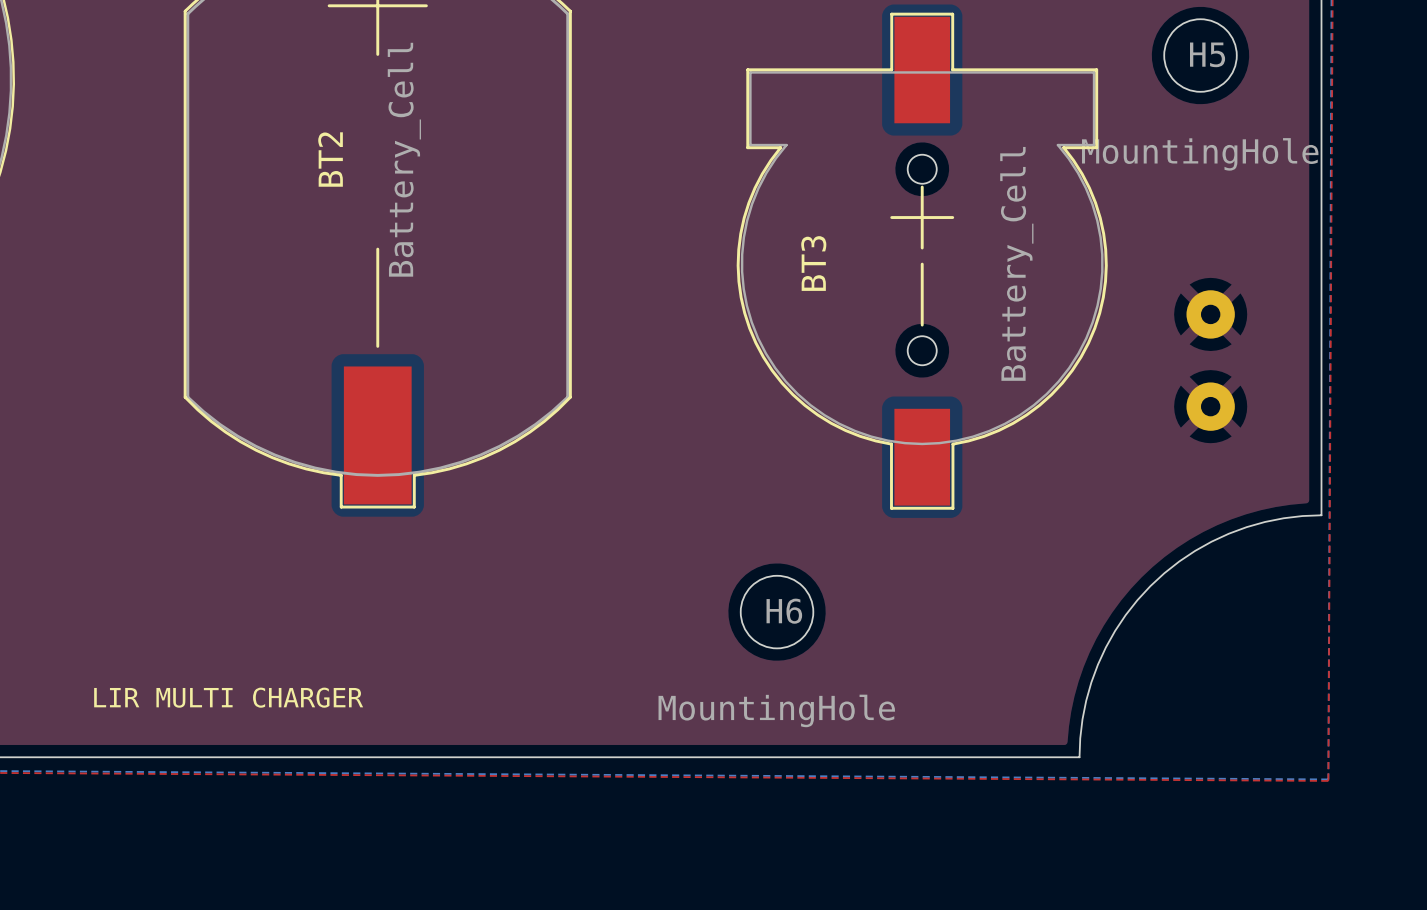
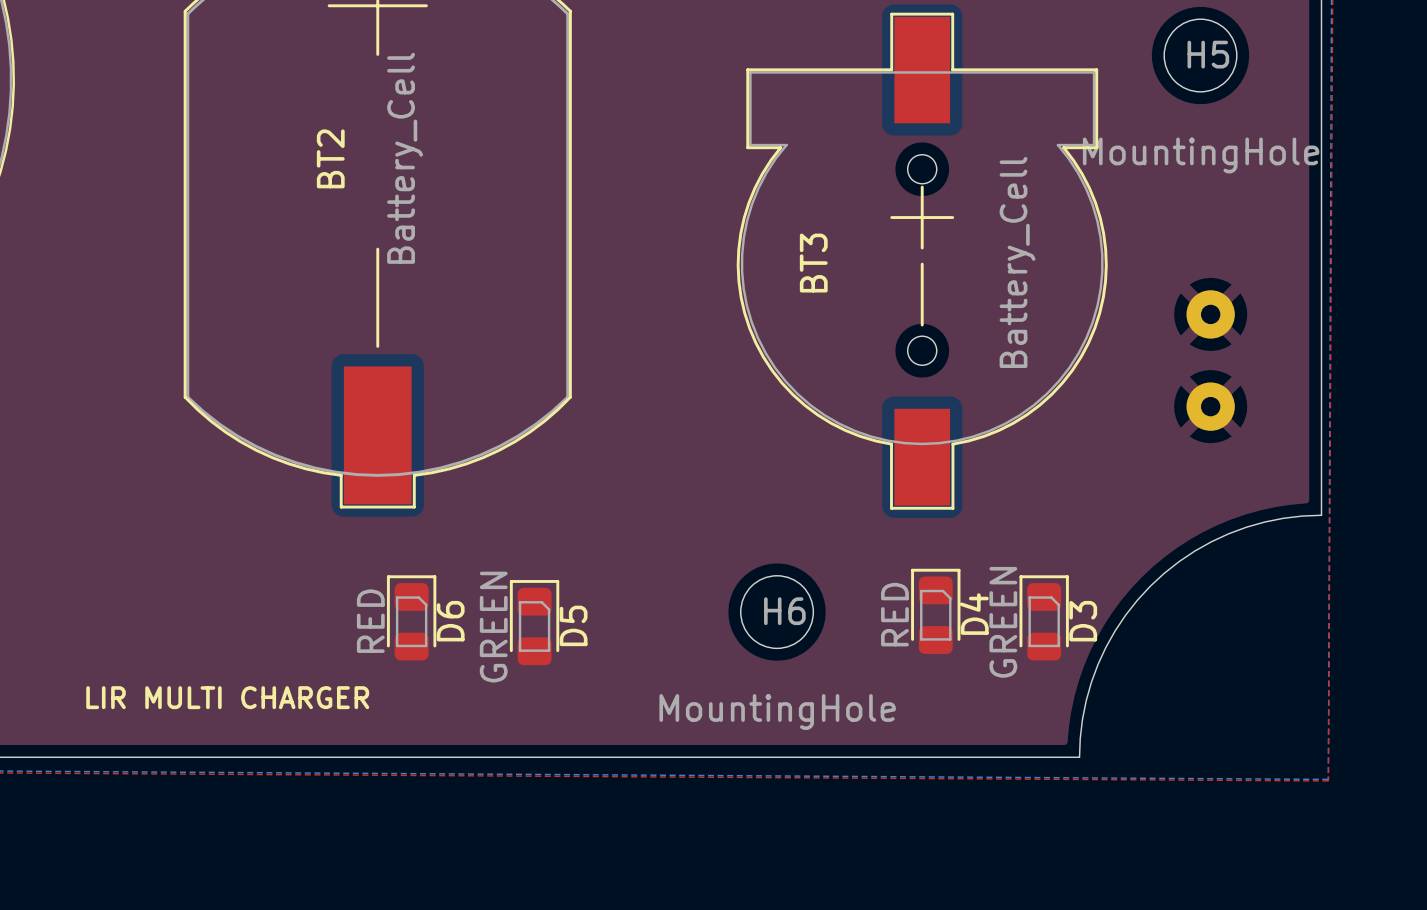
D4: none -> RED (935, 611)
D6: none -> RED (411, 617)
D3: none -> GREEN (1044, 617)
D5: none -> GREEN (534, 622)

